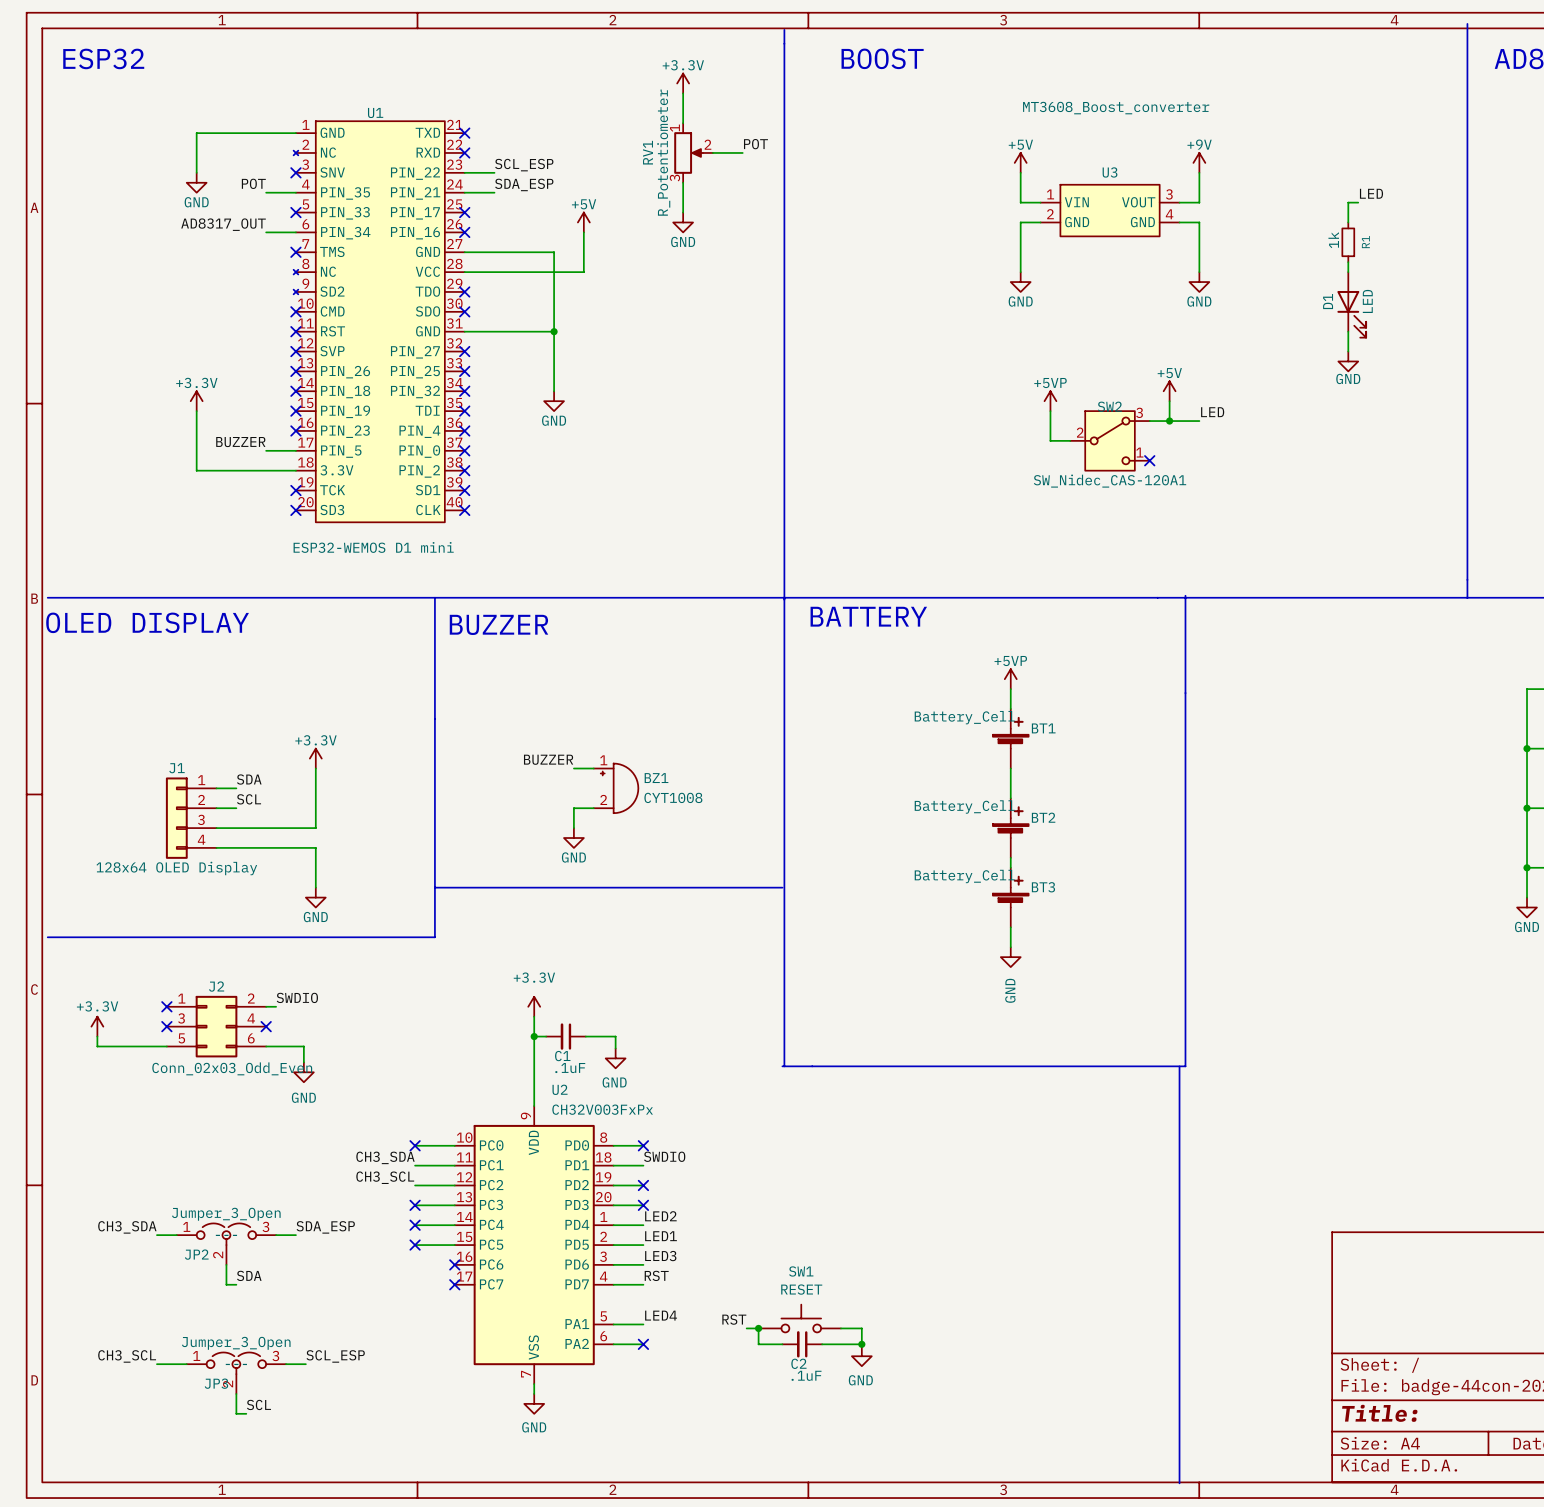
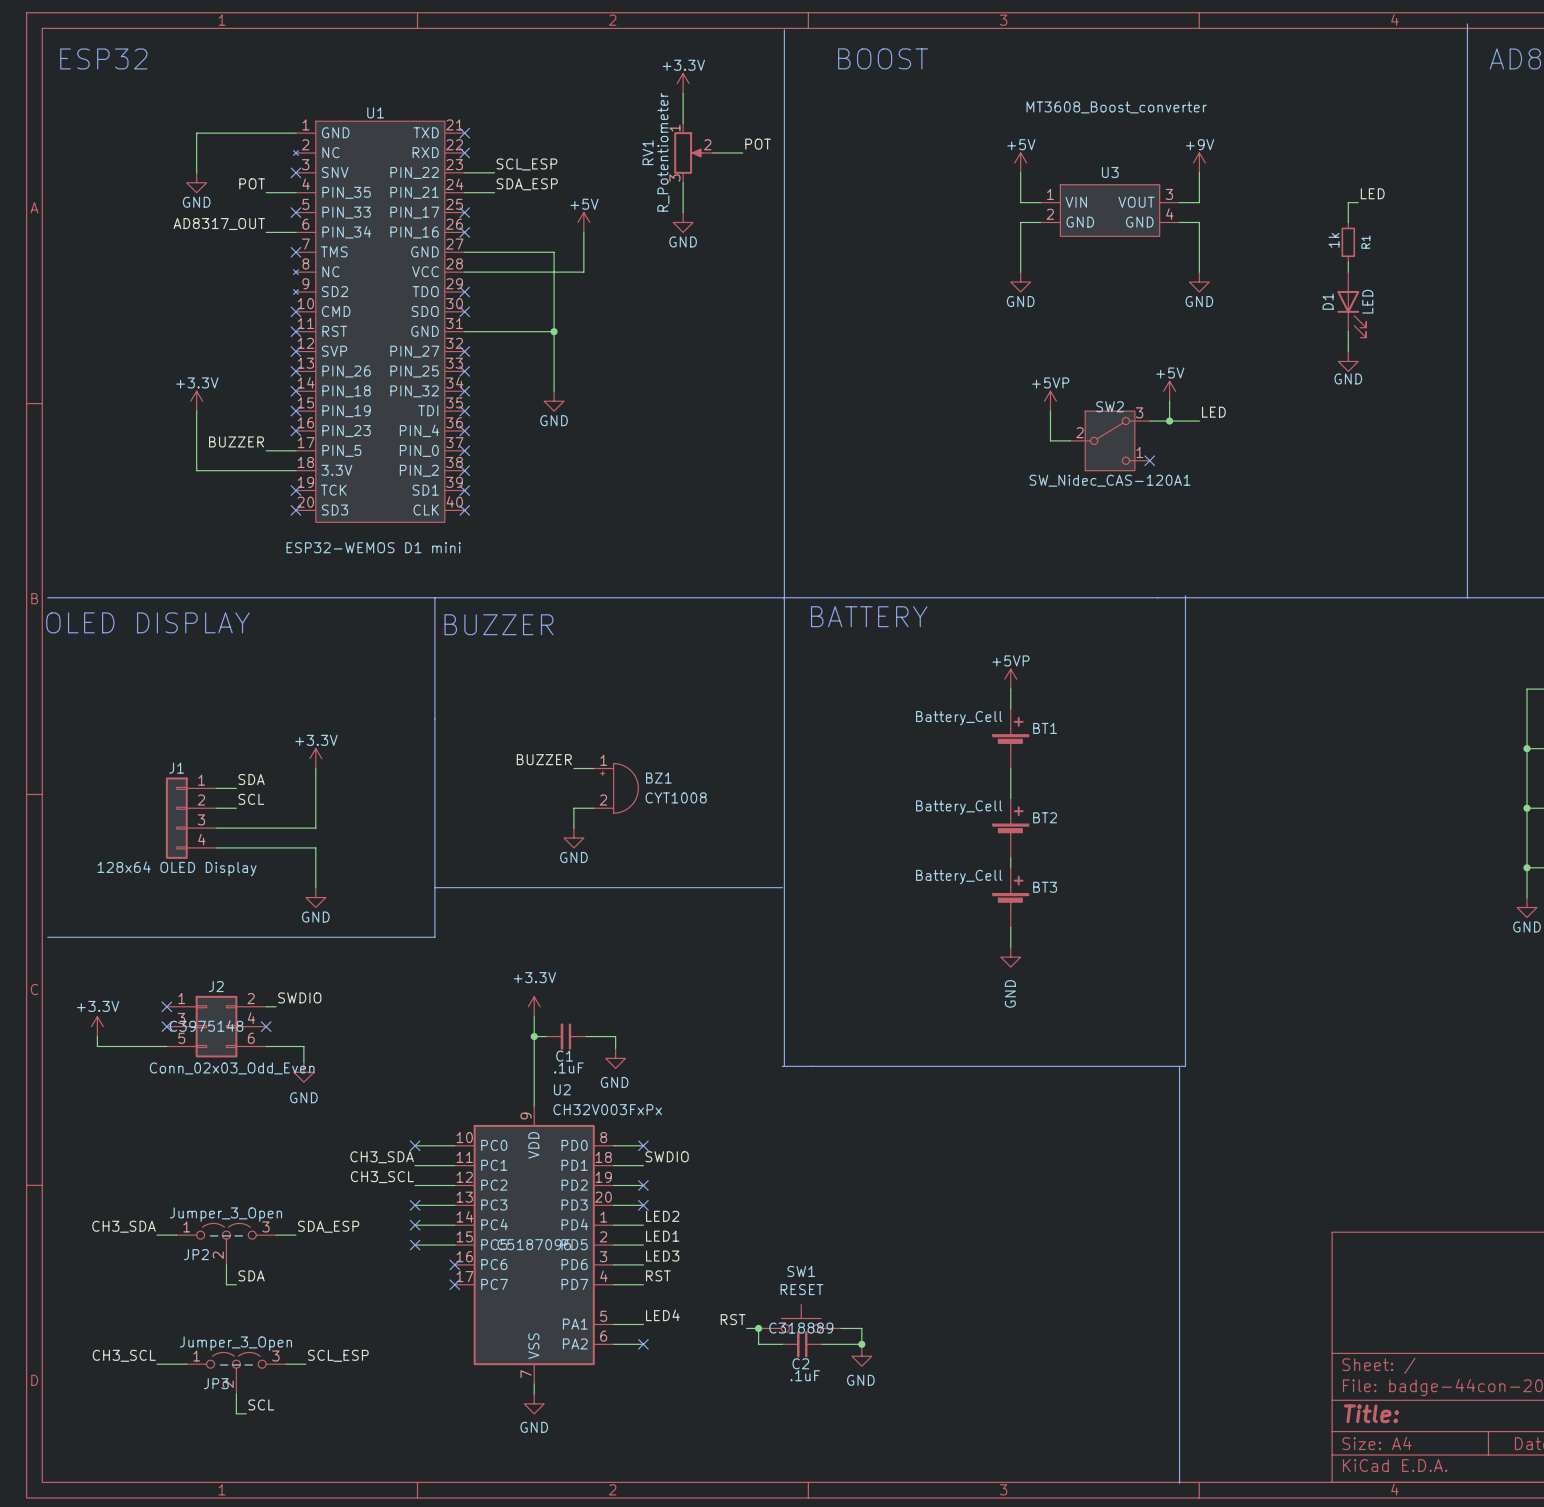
J2 text: none -> C3975148 (206, 1026)
U2 text: none -> C5187096 (534, 1244)
SW1 text: none -> C318889 (801, 1328)

